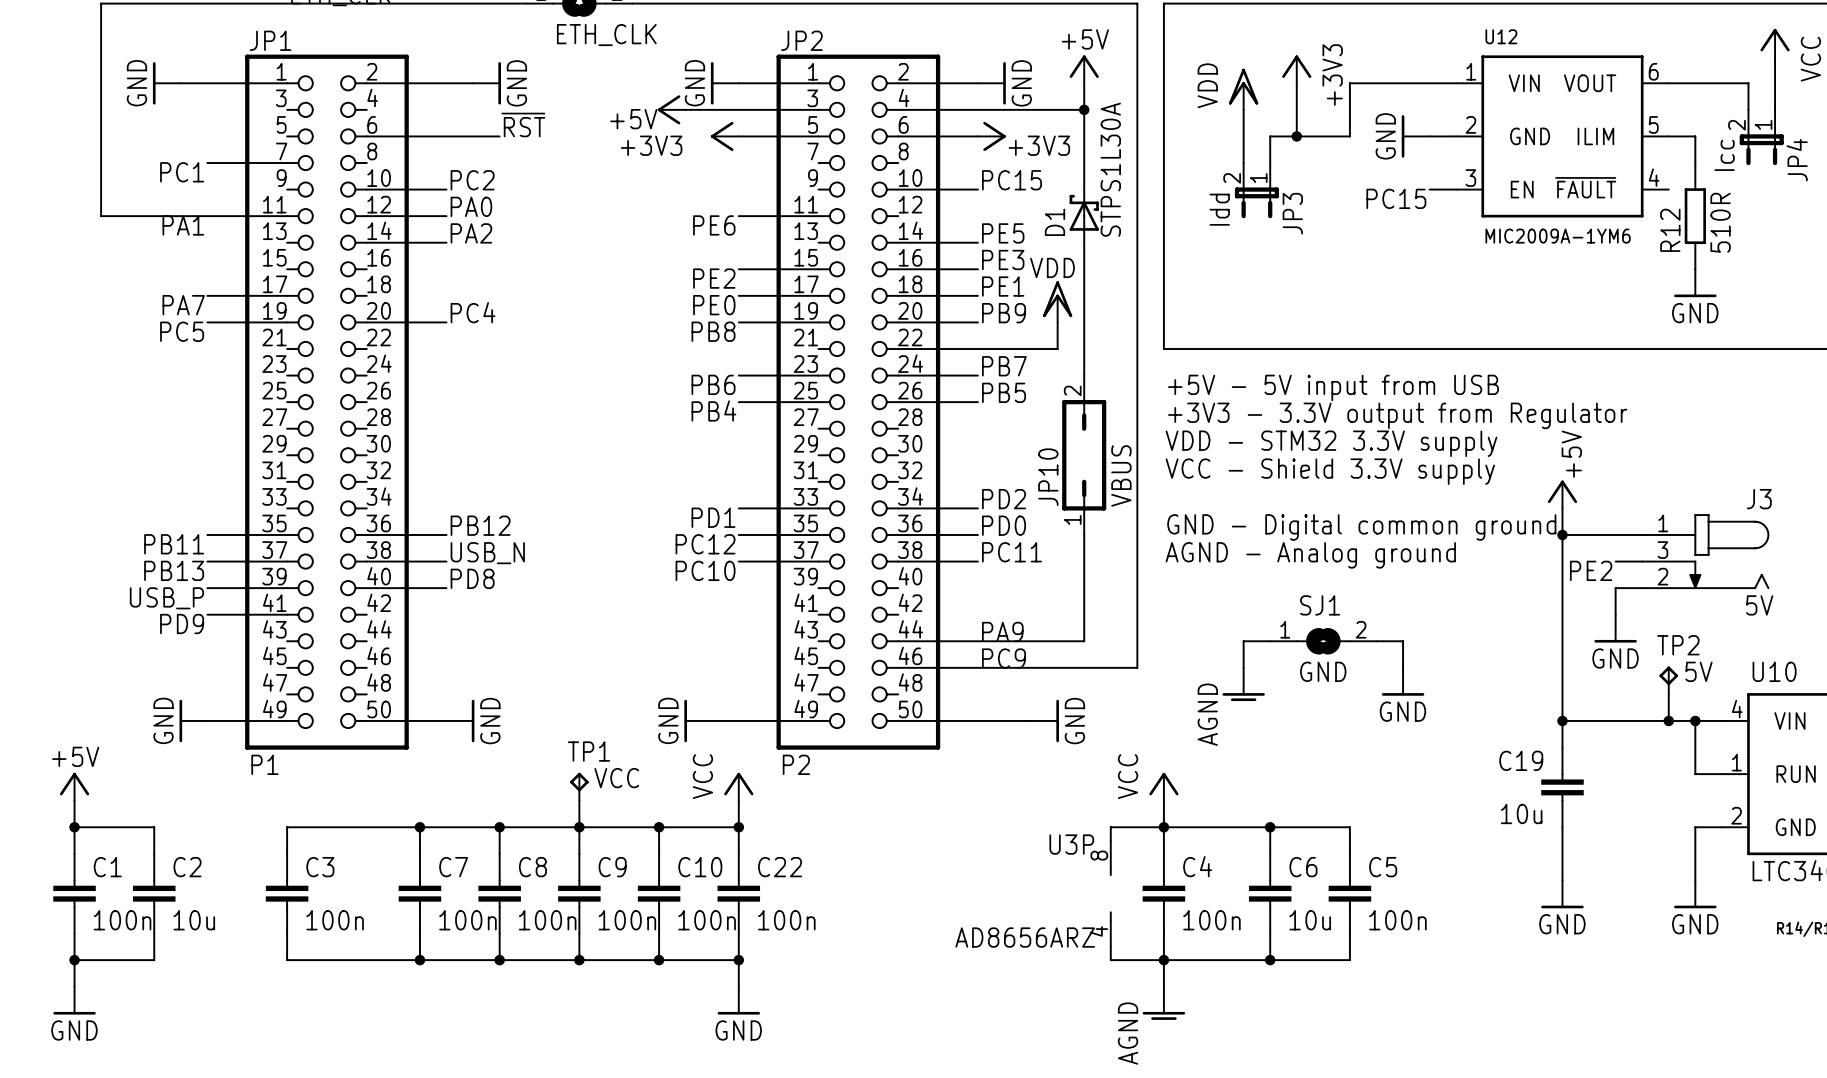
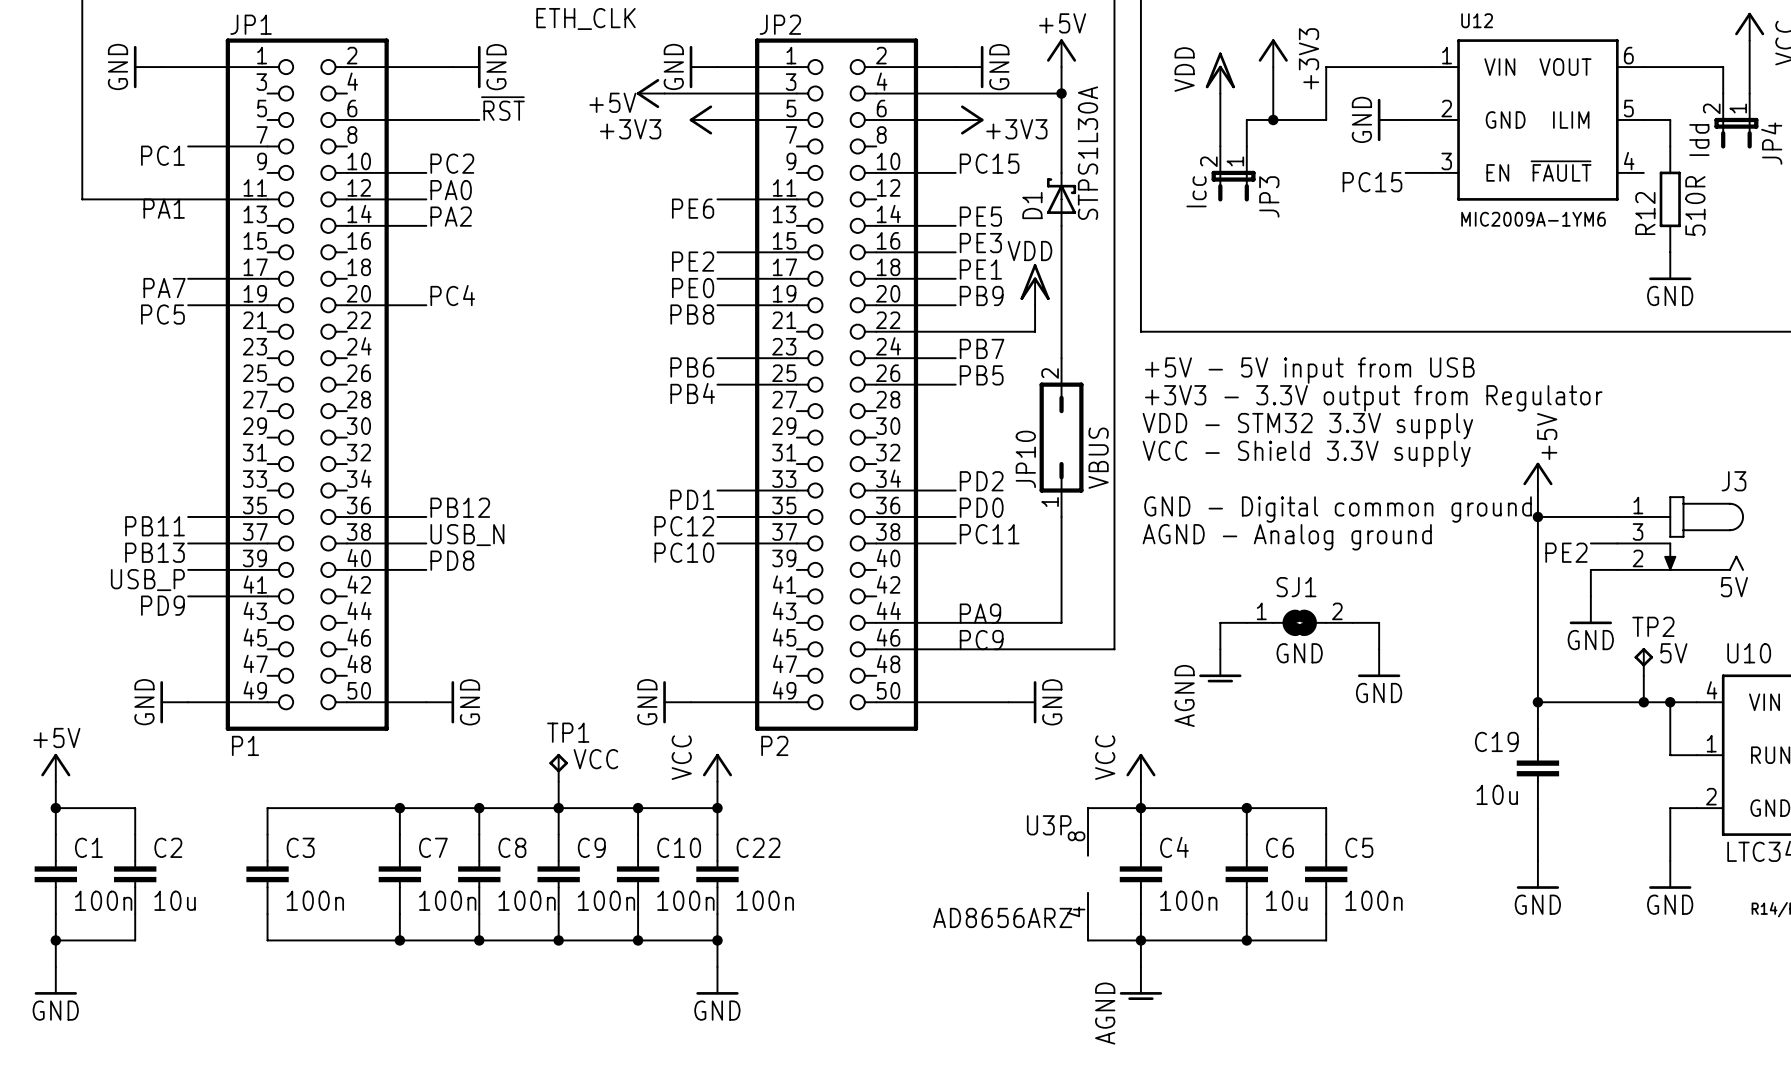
JP4 value: Icc (1724, 155) -> Idd (1699, 140)
JP3 value: Idd (1219, 209) -> Icc (1196, 191)

